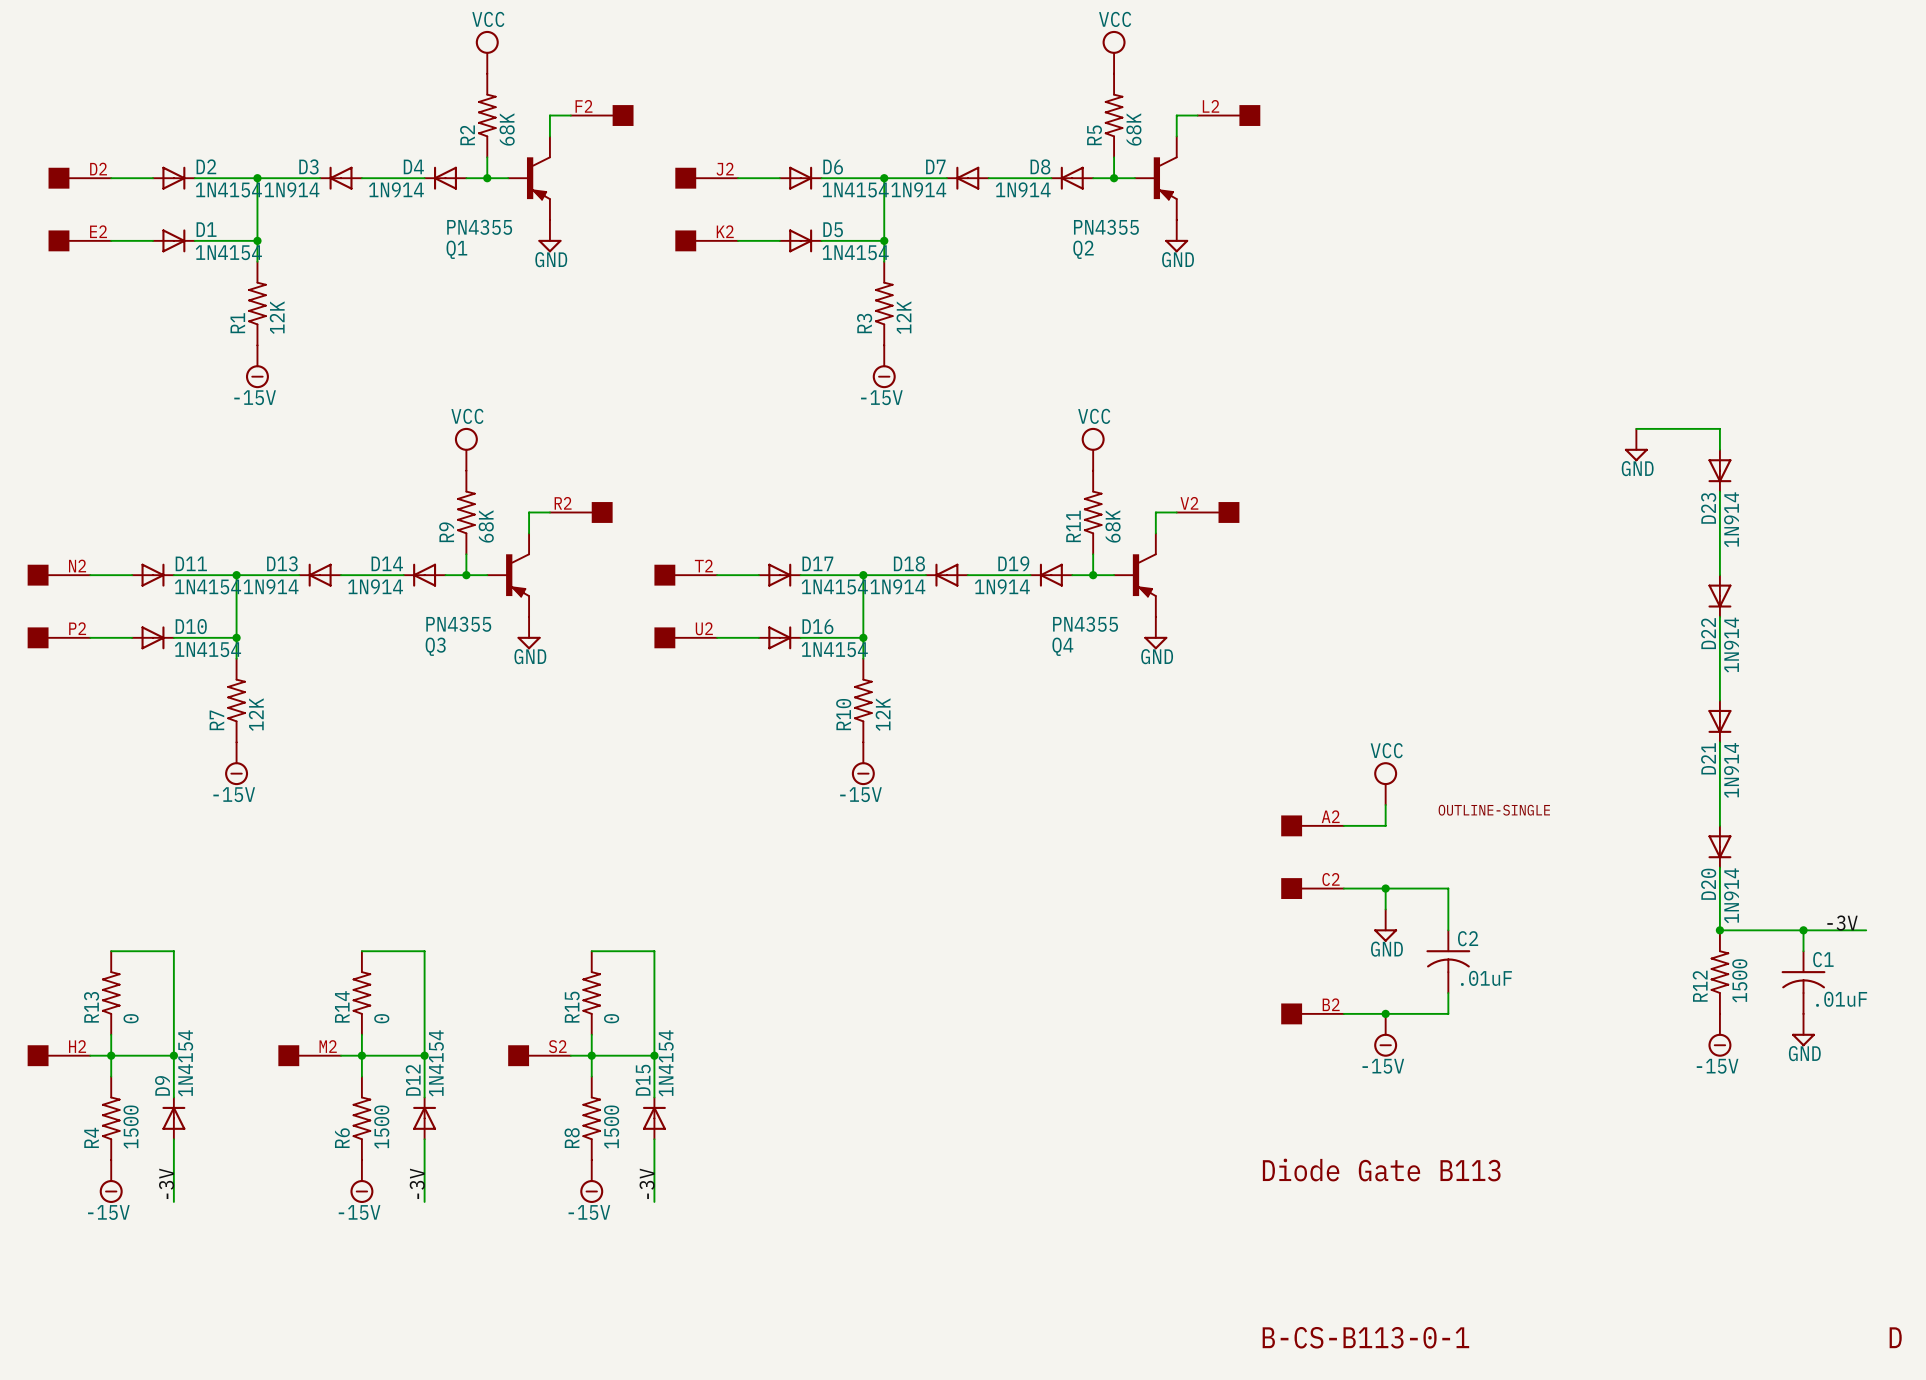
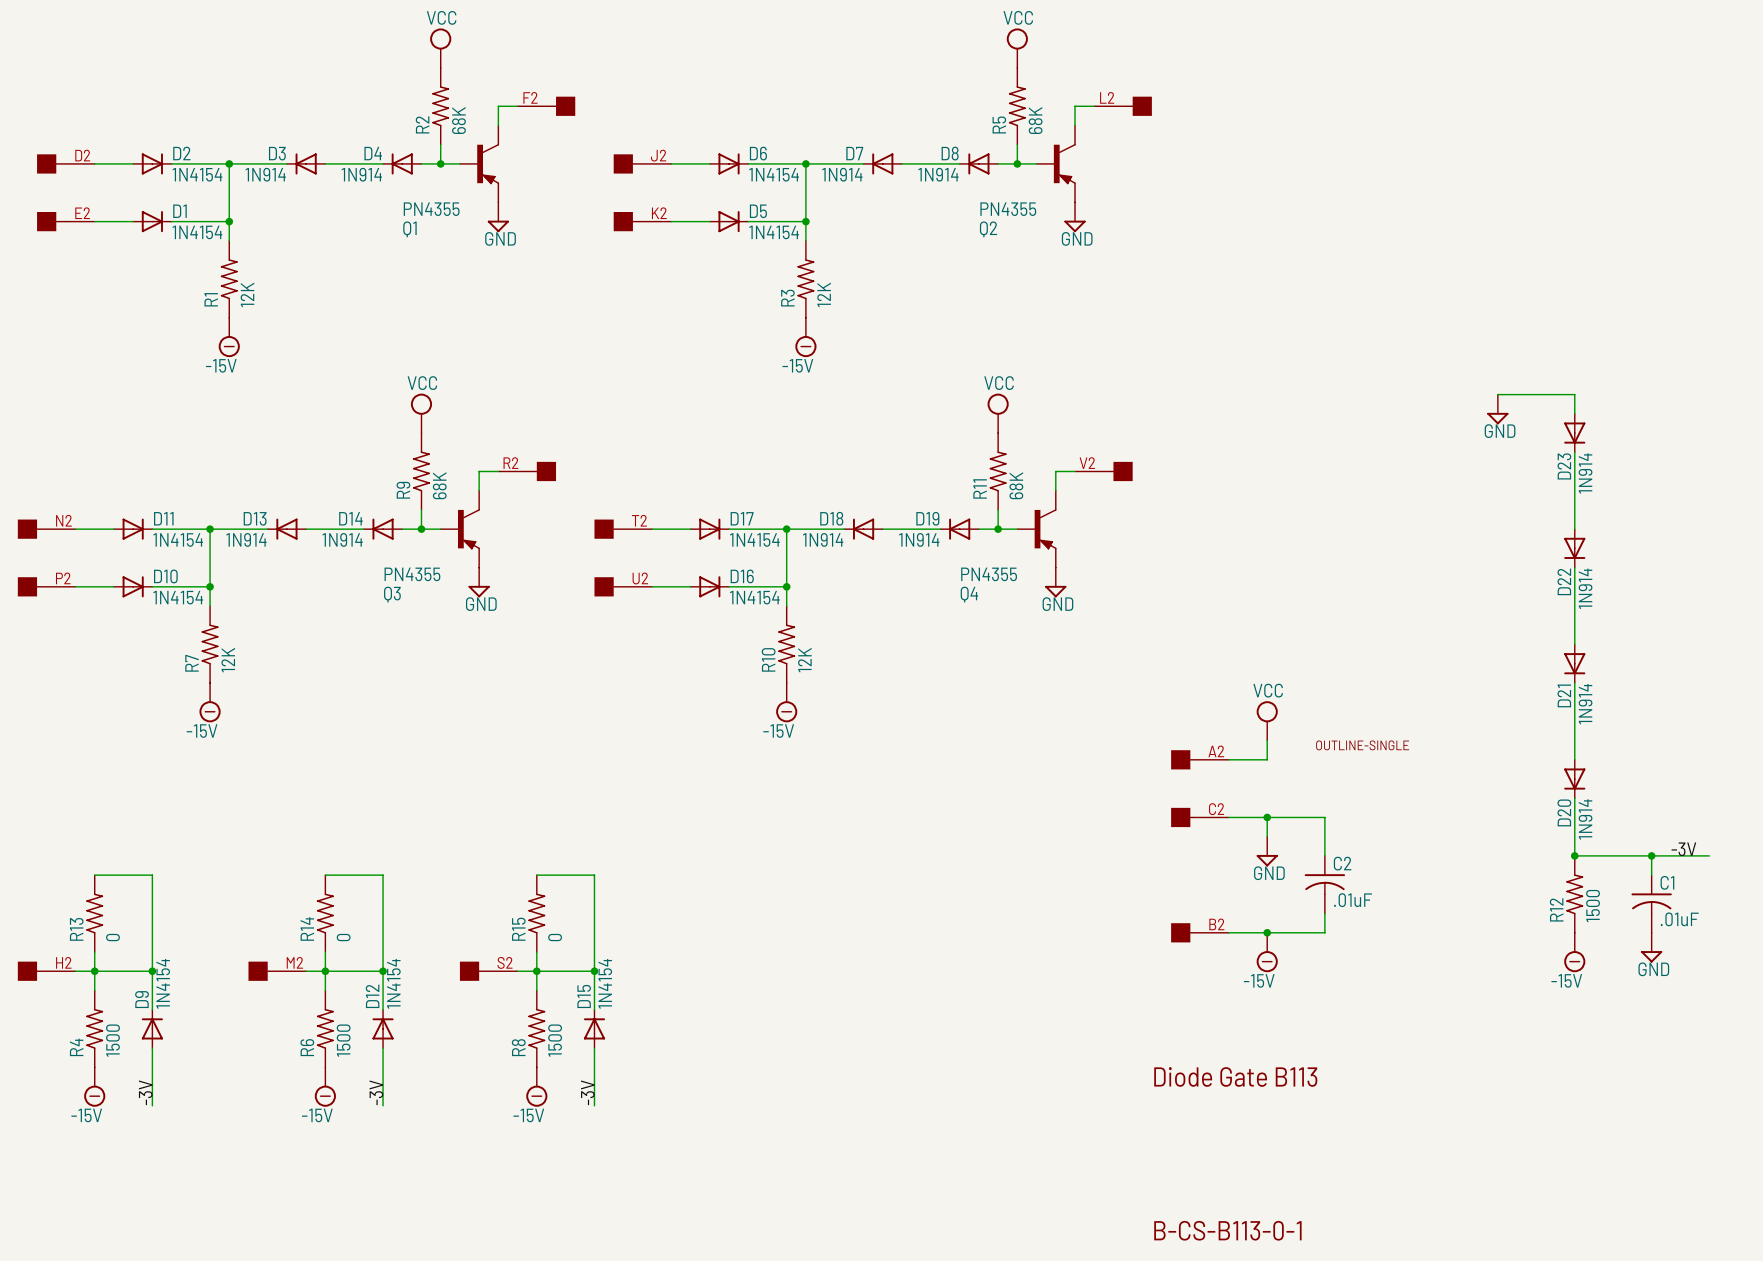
text: D (1895, 1337) -> none

